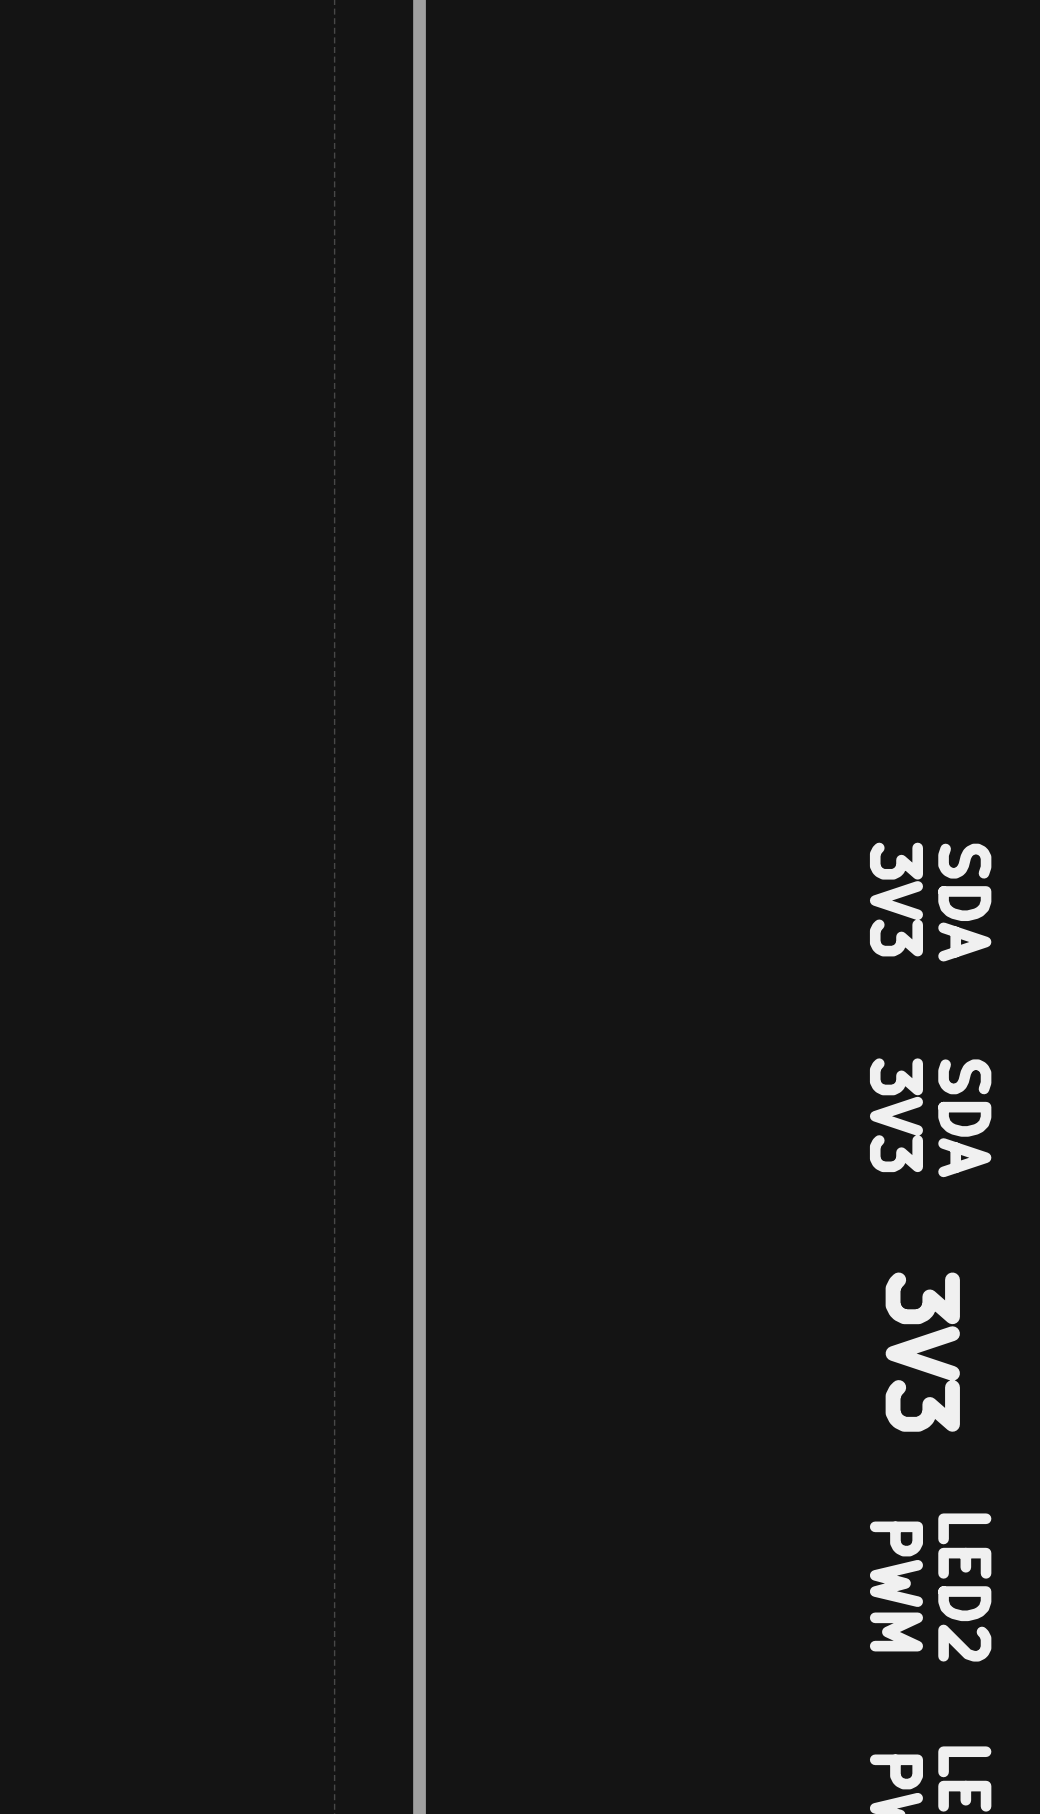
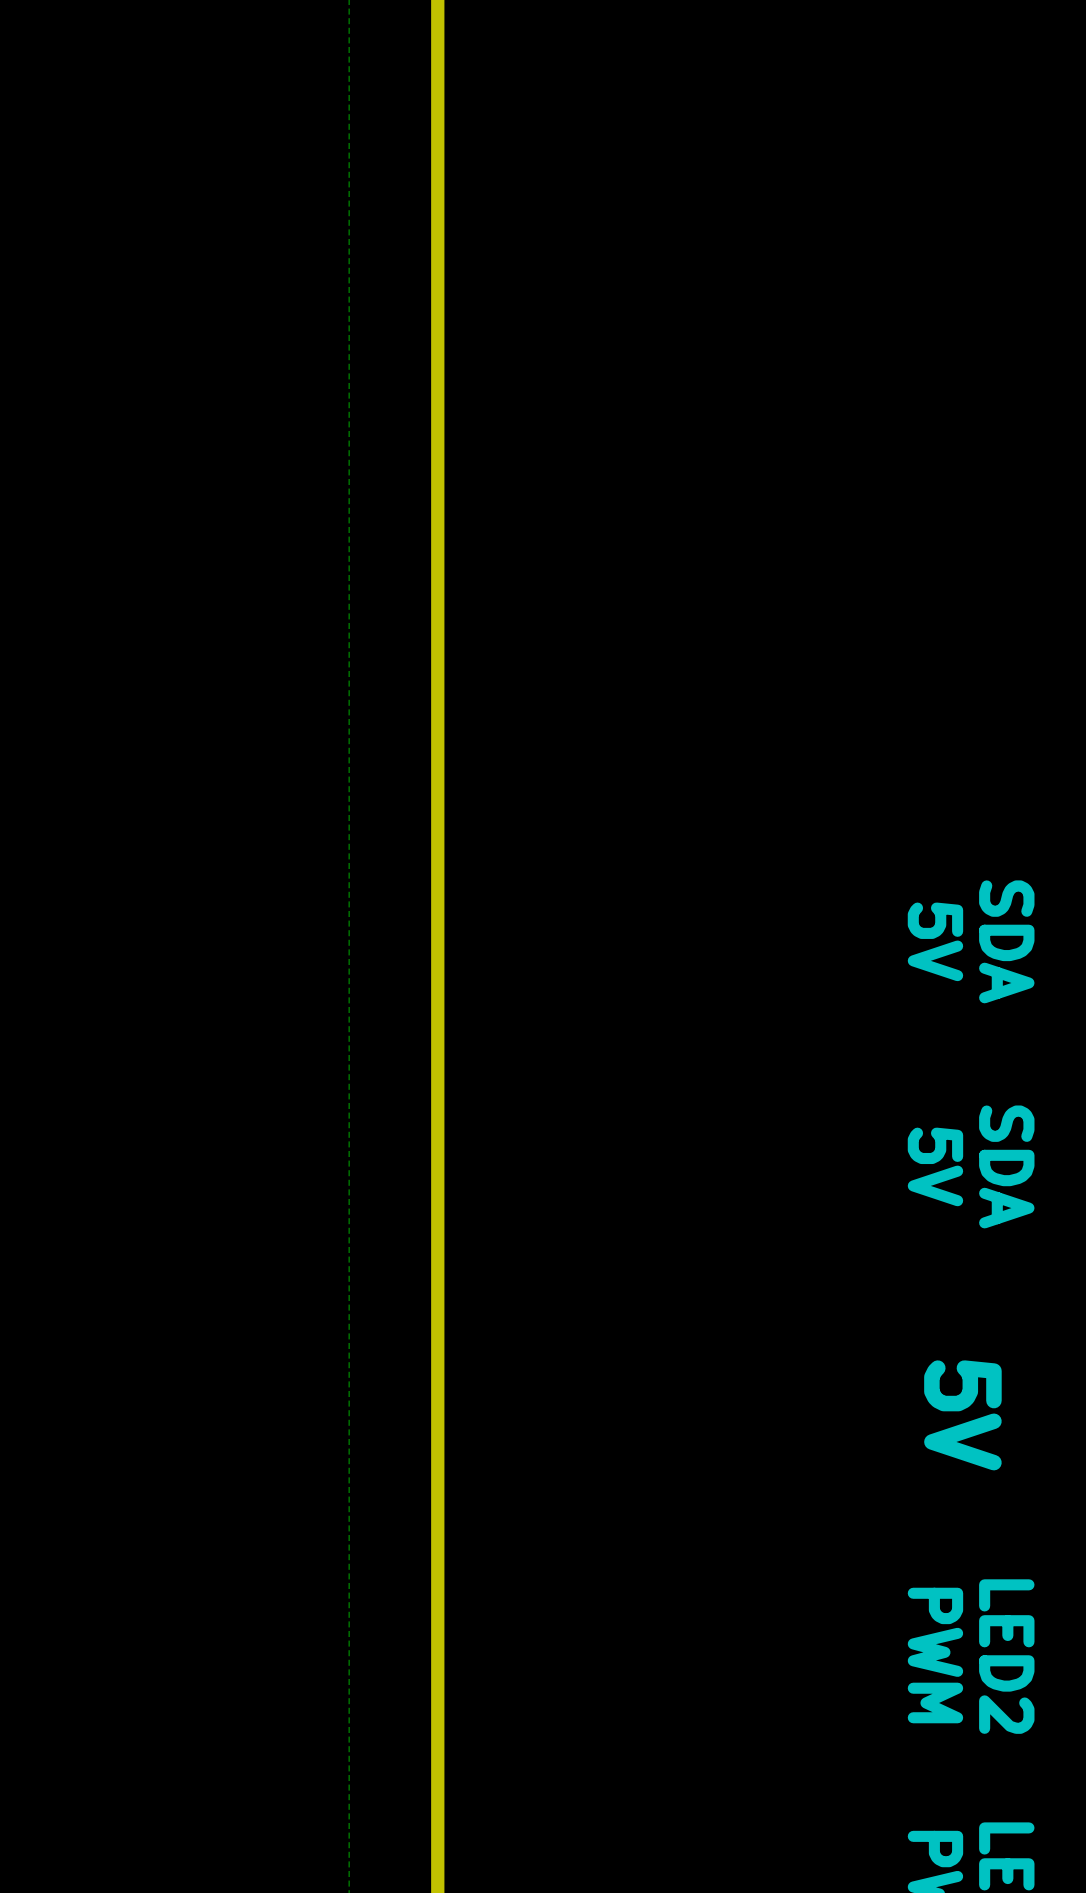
text: 3V3 (896, 899) -> 5V (935, 941)
text: 3V3 (896, 1115) -> 5V (935, 1166)
text: 3V3 (922, 1352) -> 5V (962, 1415)

